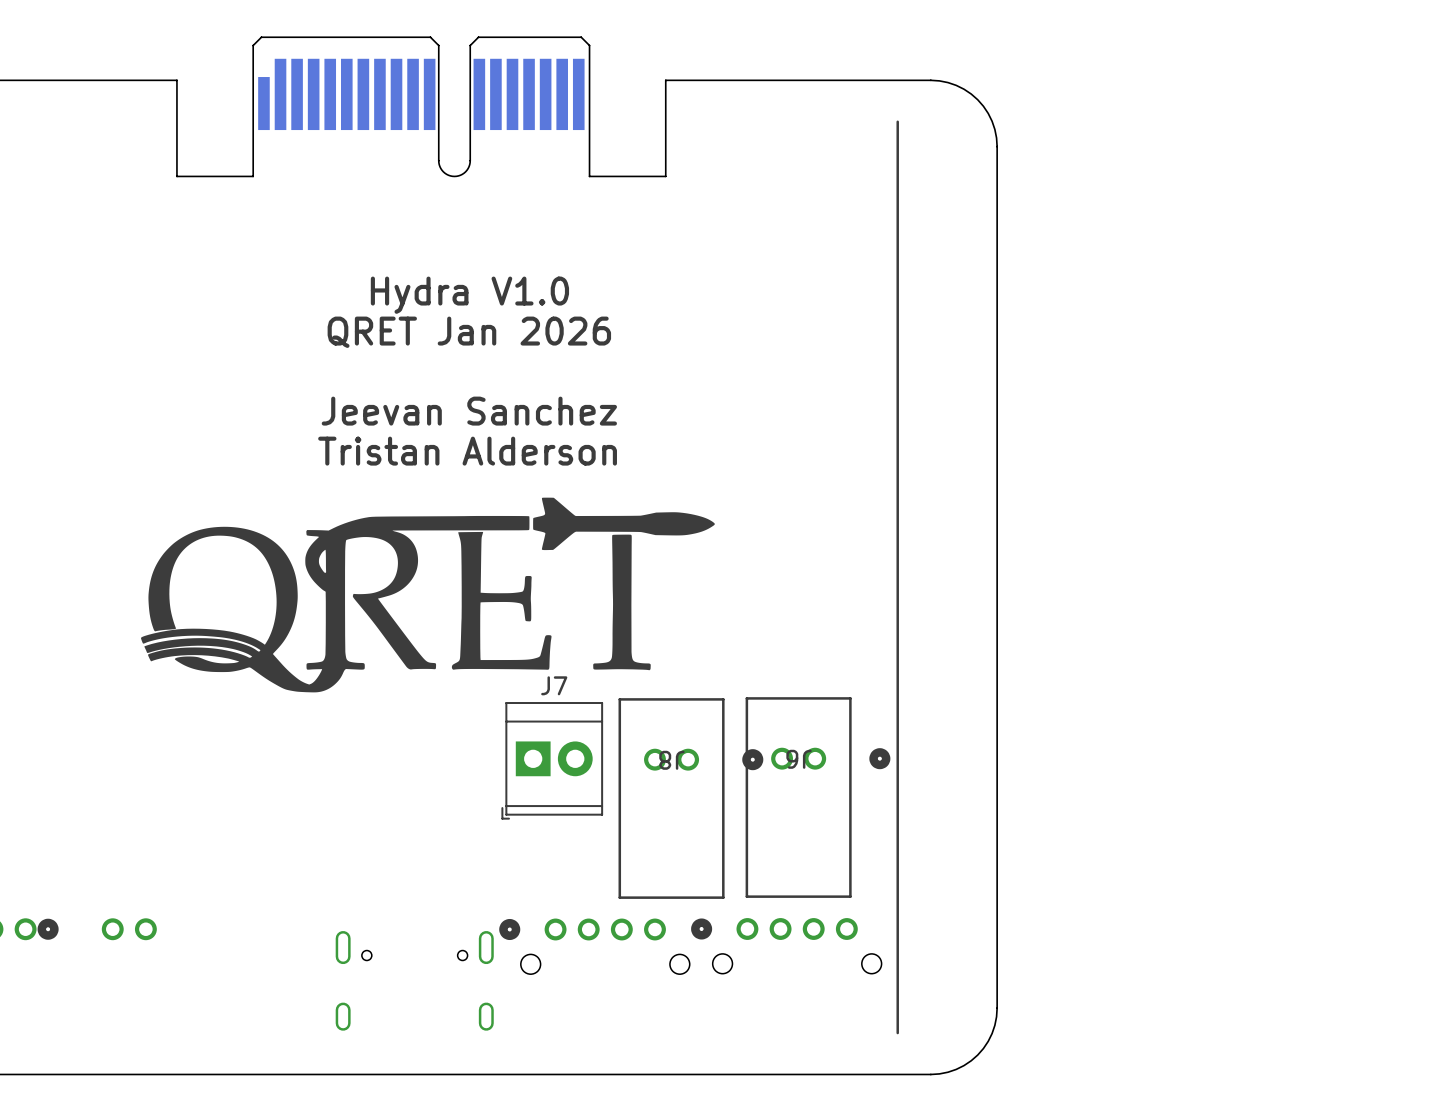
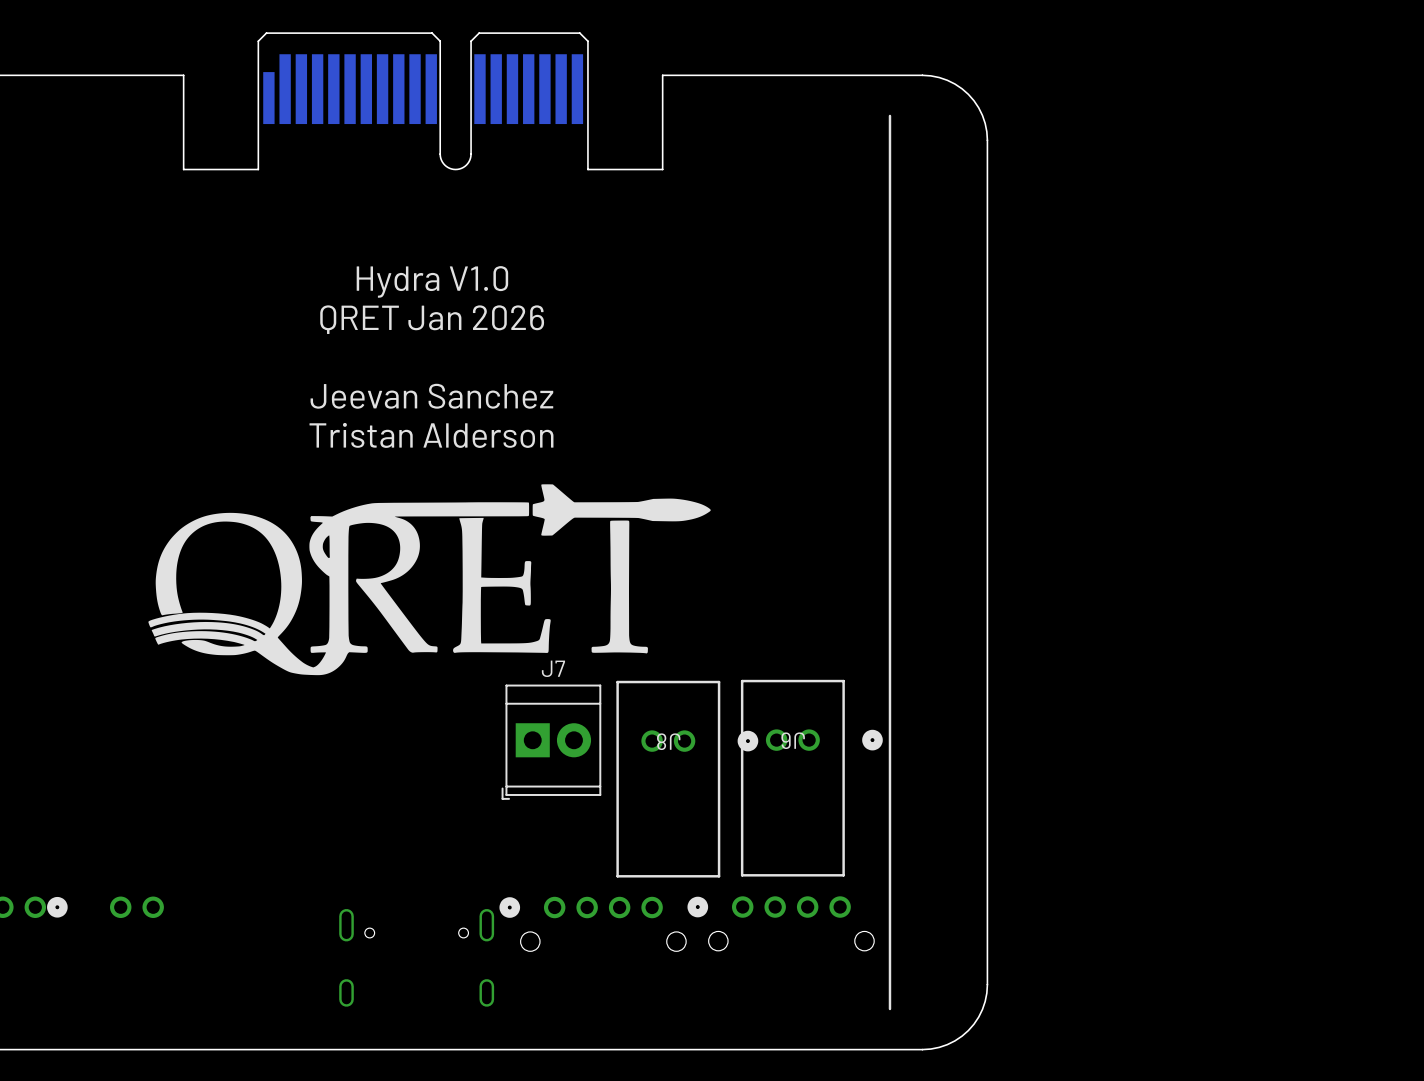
text position: Hydra V1.0 (469, 295) -> Hydra V1.0 (432, 281)
text position: QRET Jan 2026 (469, 332) -> QRET Jan 2026 (432, 319)
text position: Jeevan Sanchez (469, 411) -> Jeevan Sanchez (431, 396)
text position: Tristan Alderson (467, 451) -> Tristan Alderson (431, 435)

